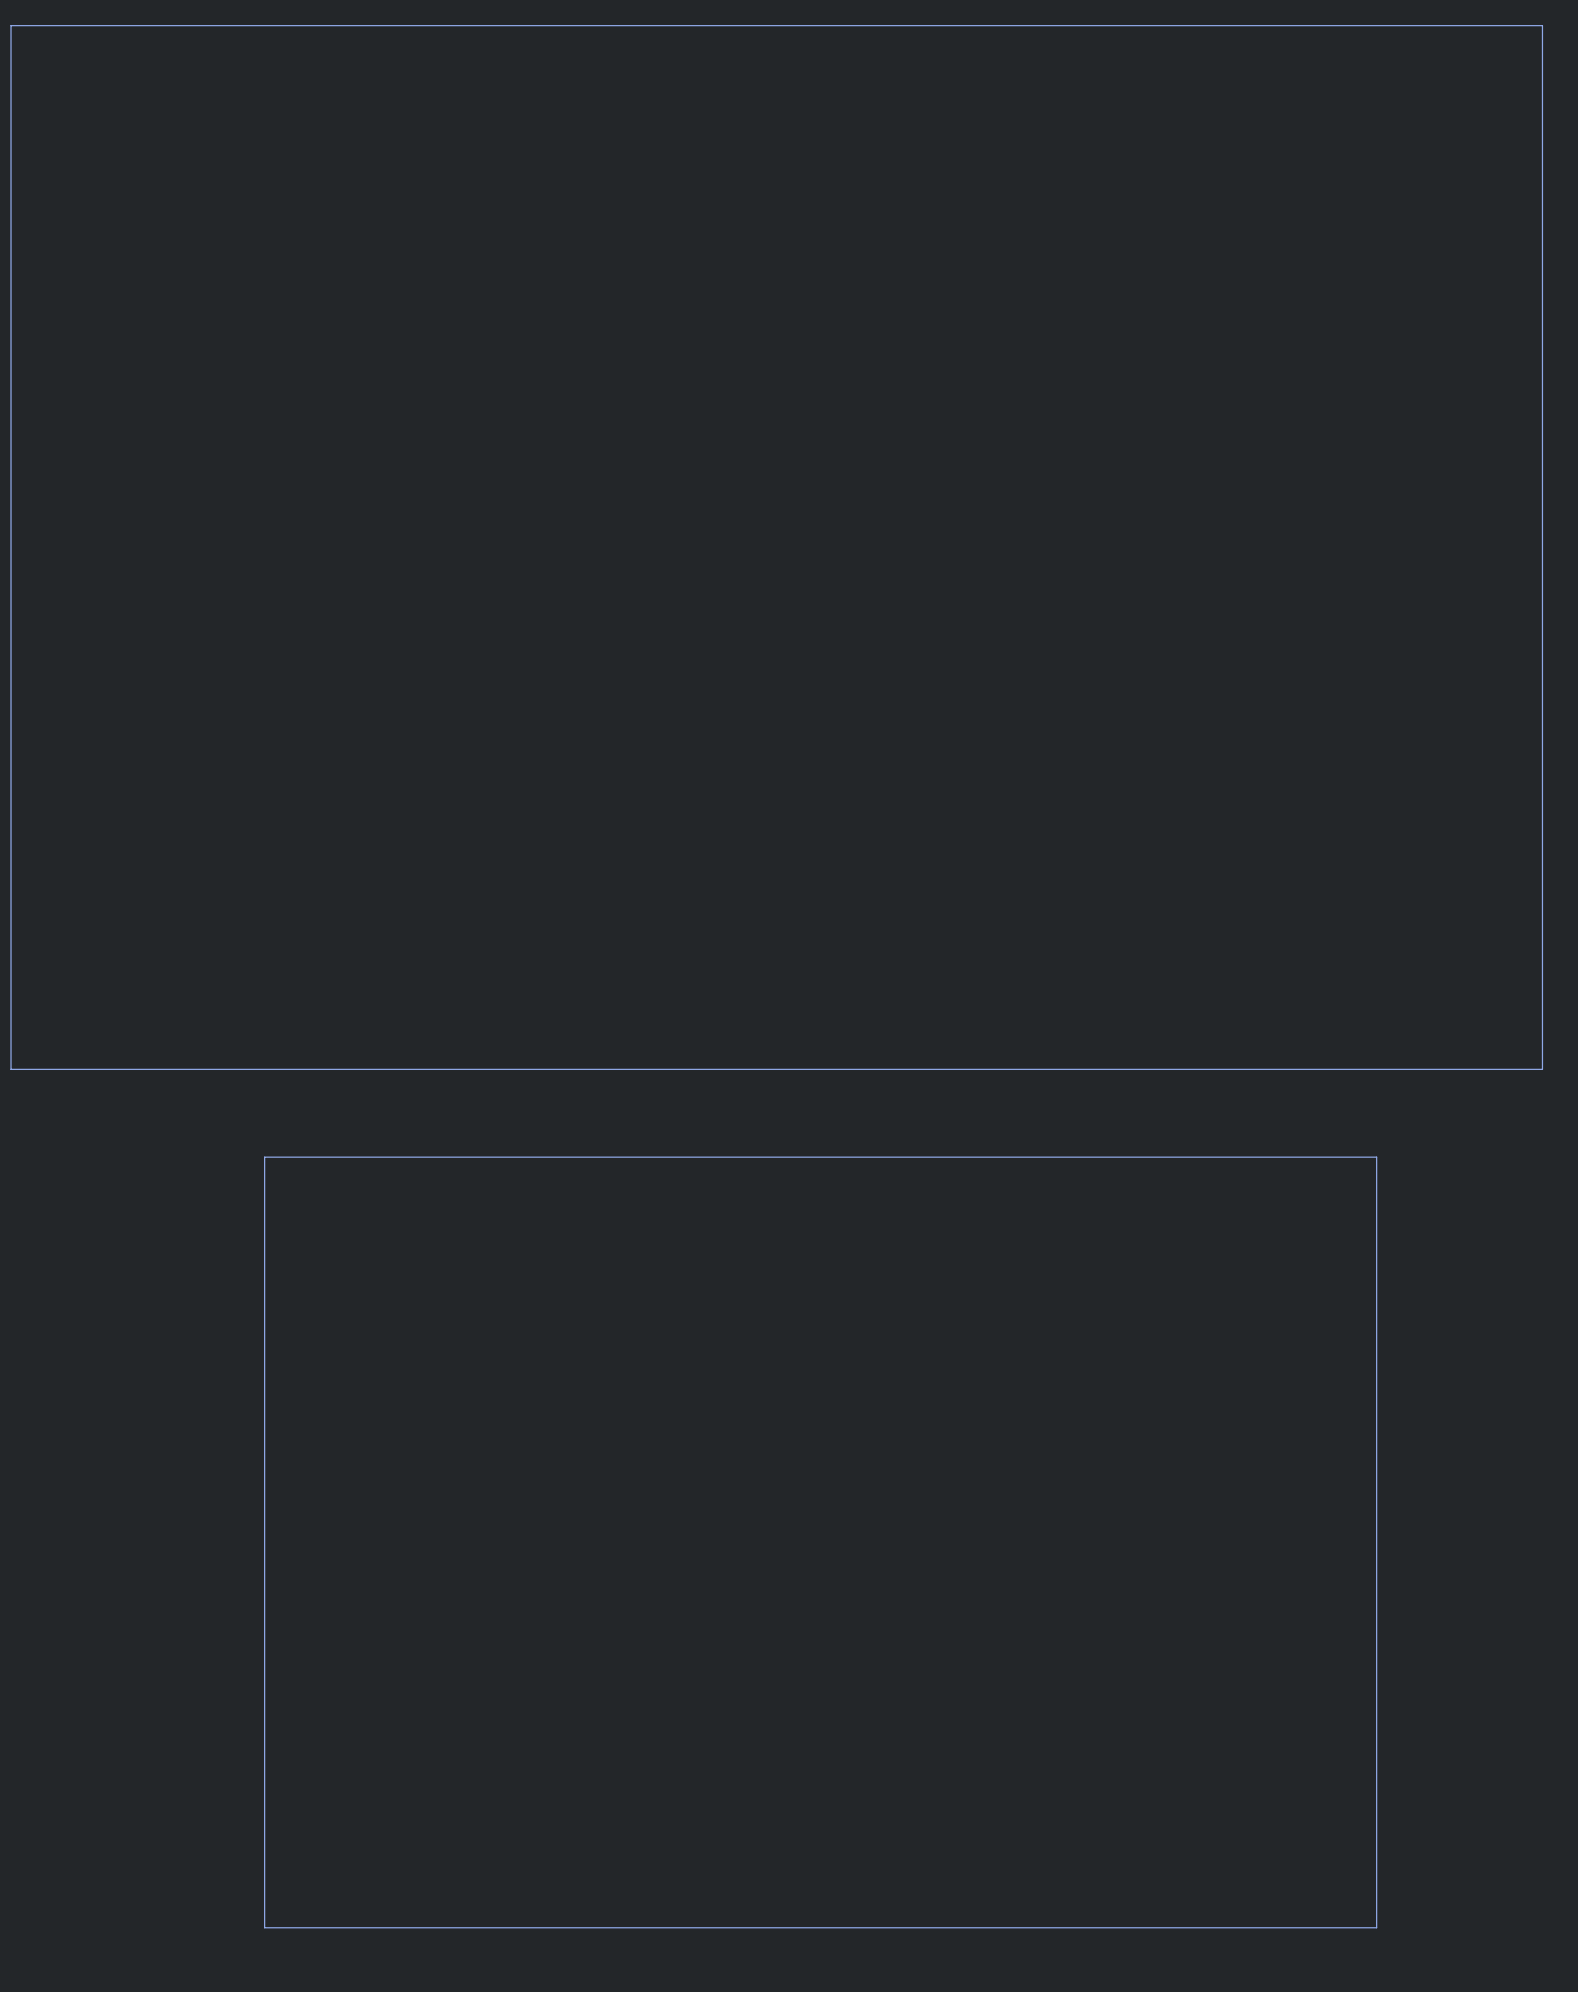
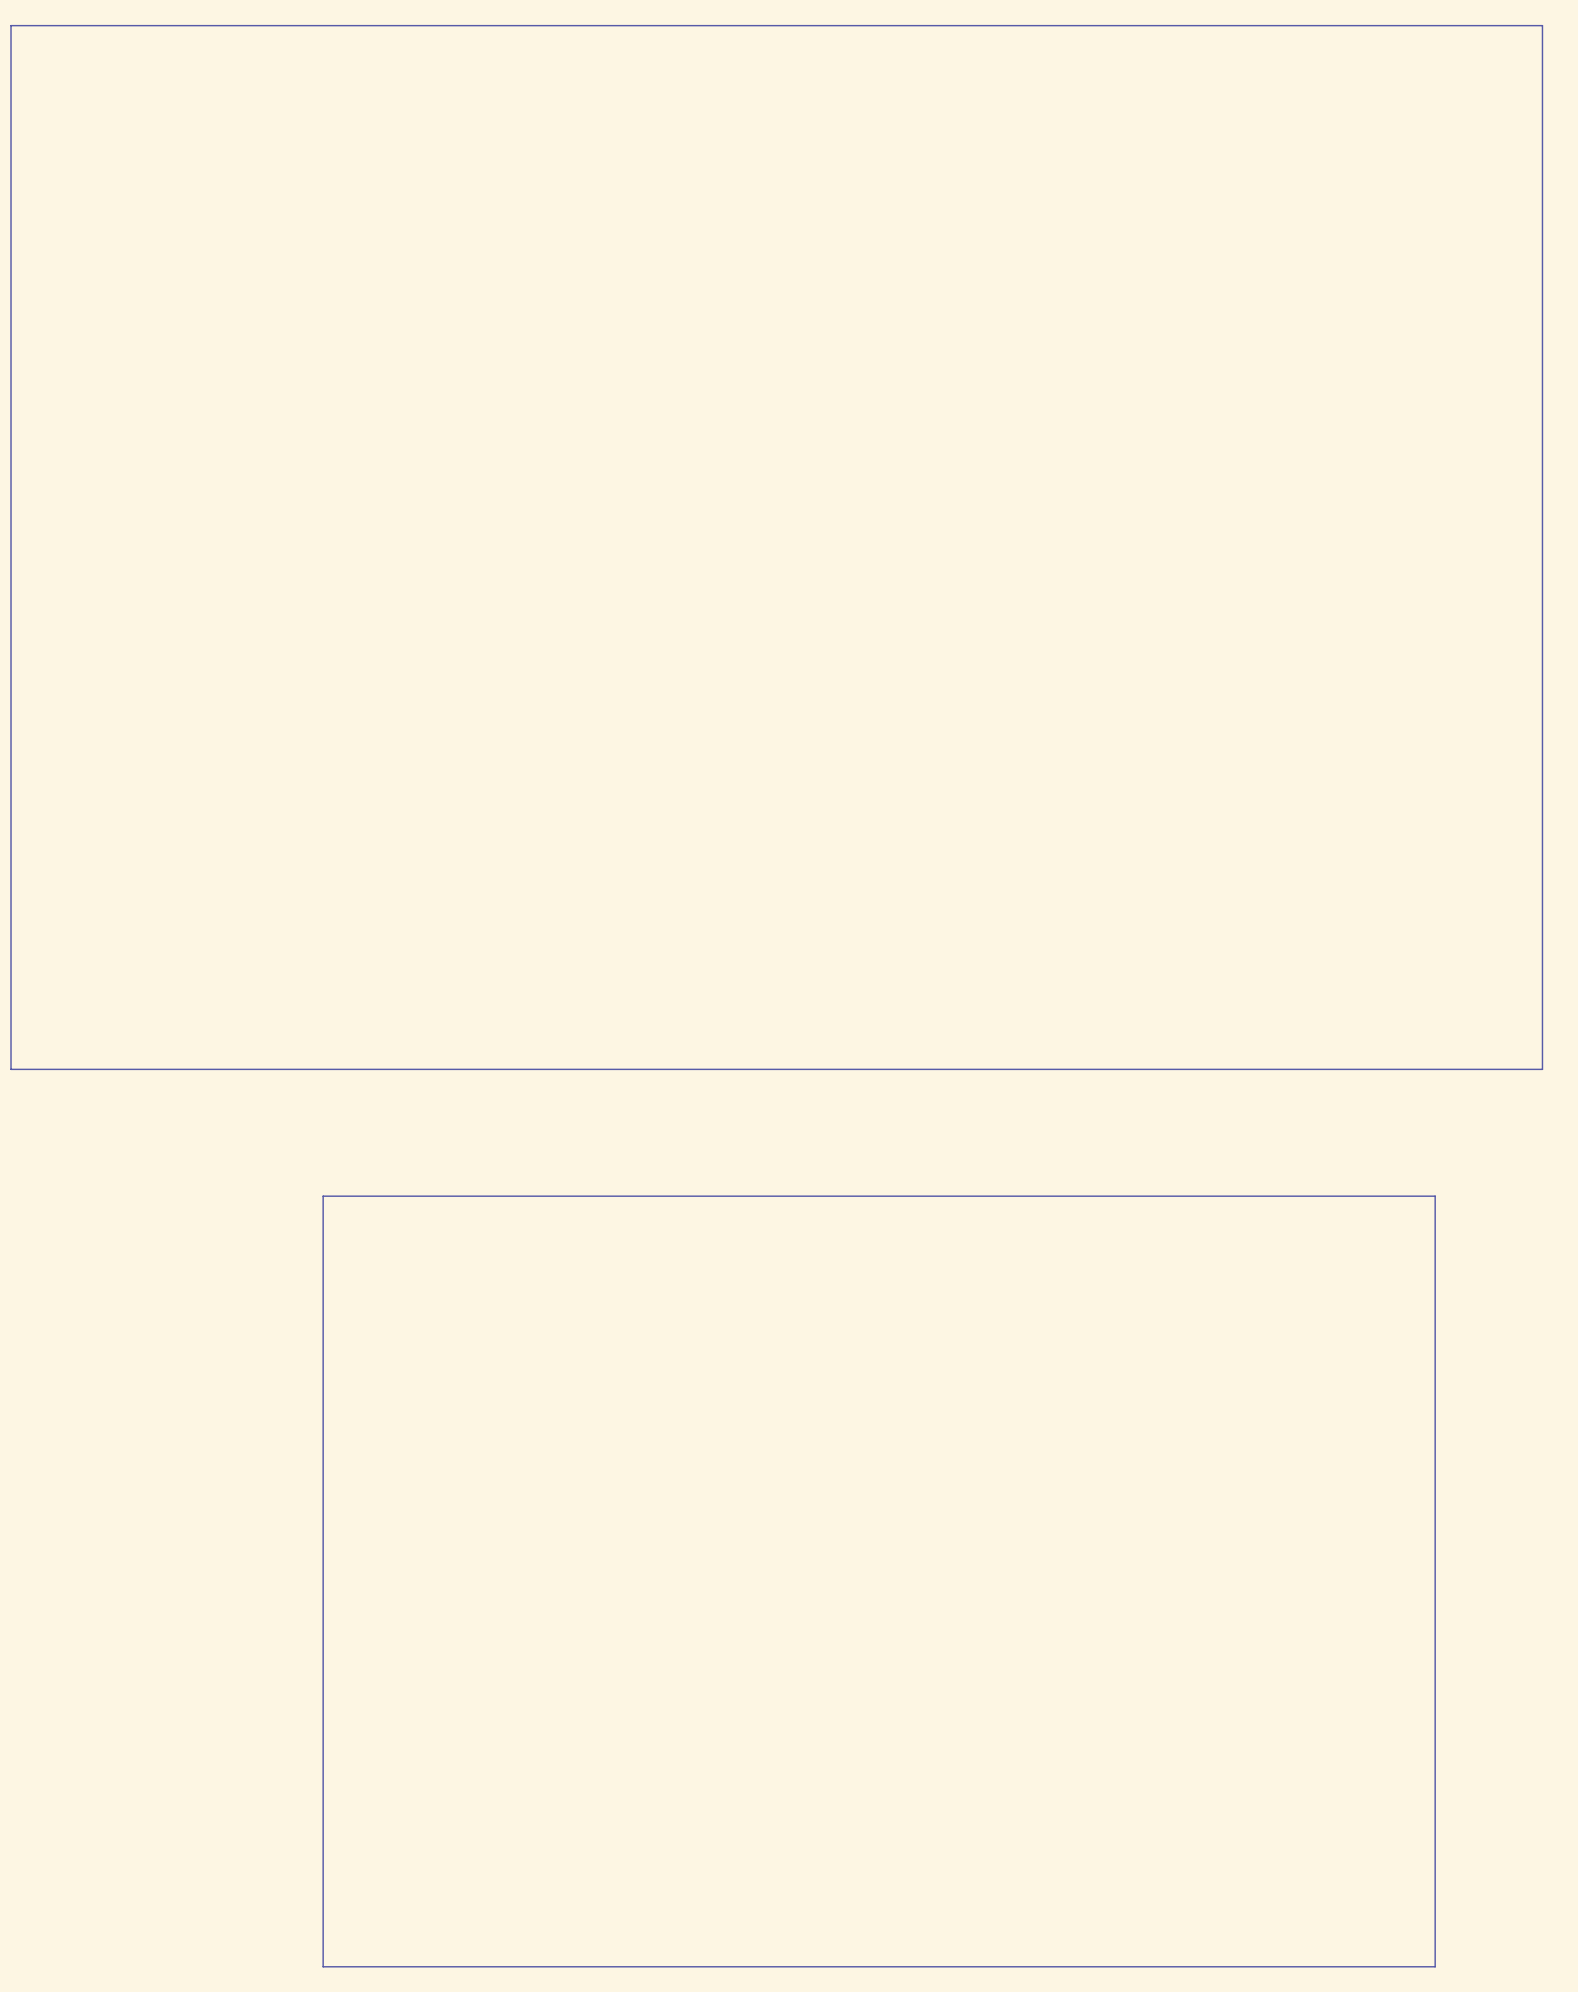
line: (264, 1157) (264, 1927) (1376, 1927) (1376, 1157) (264, 1157) -> (323, 1196) (323, 1966) (1435, 1966) (1435, 1196) (323, 1196)

